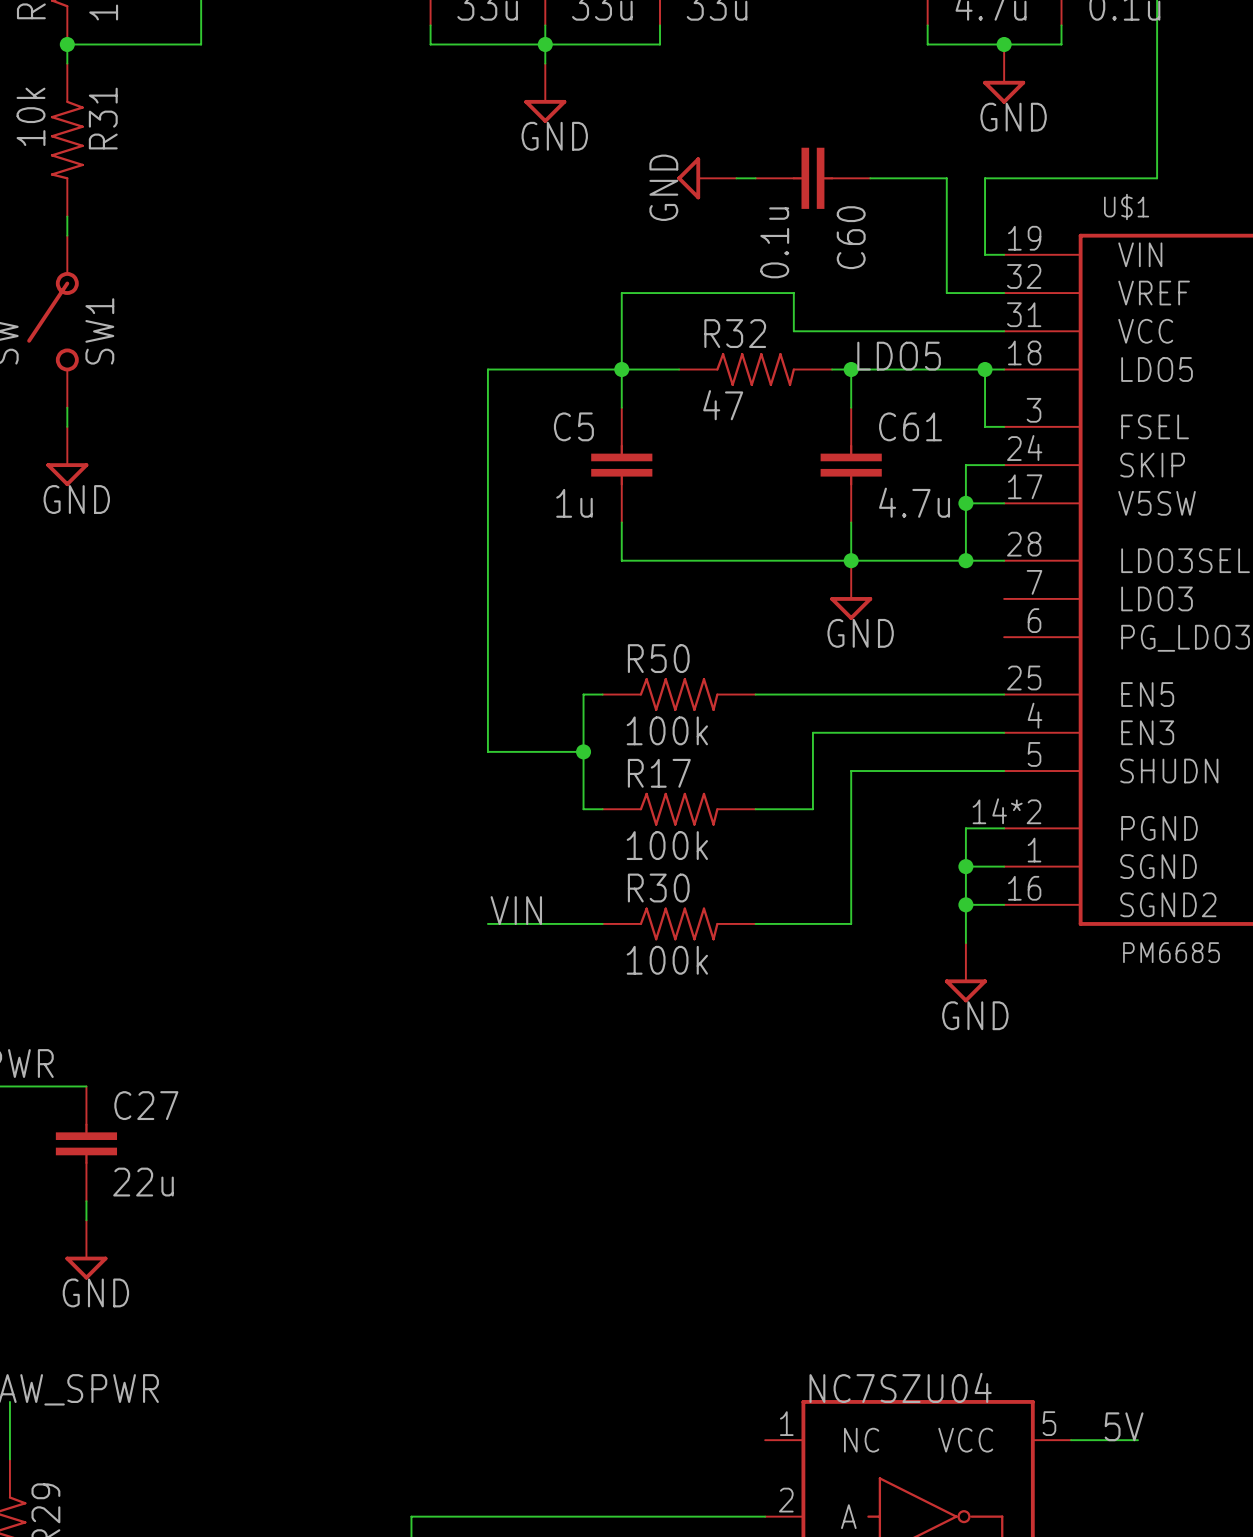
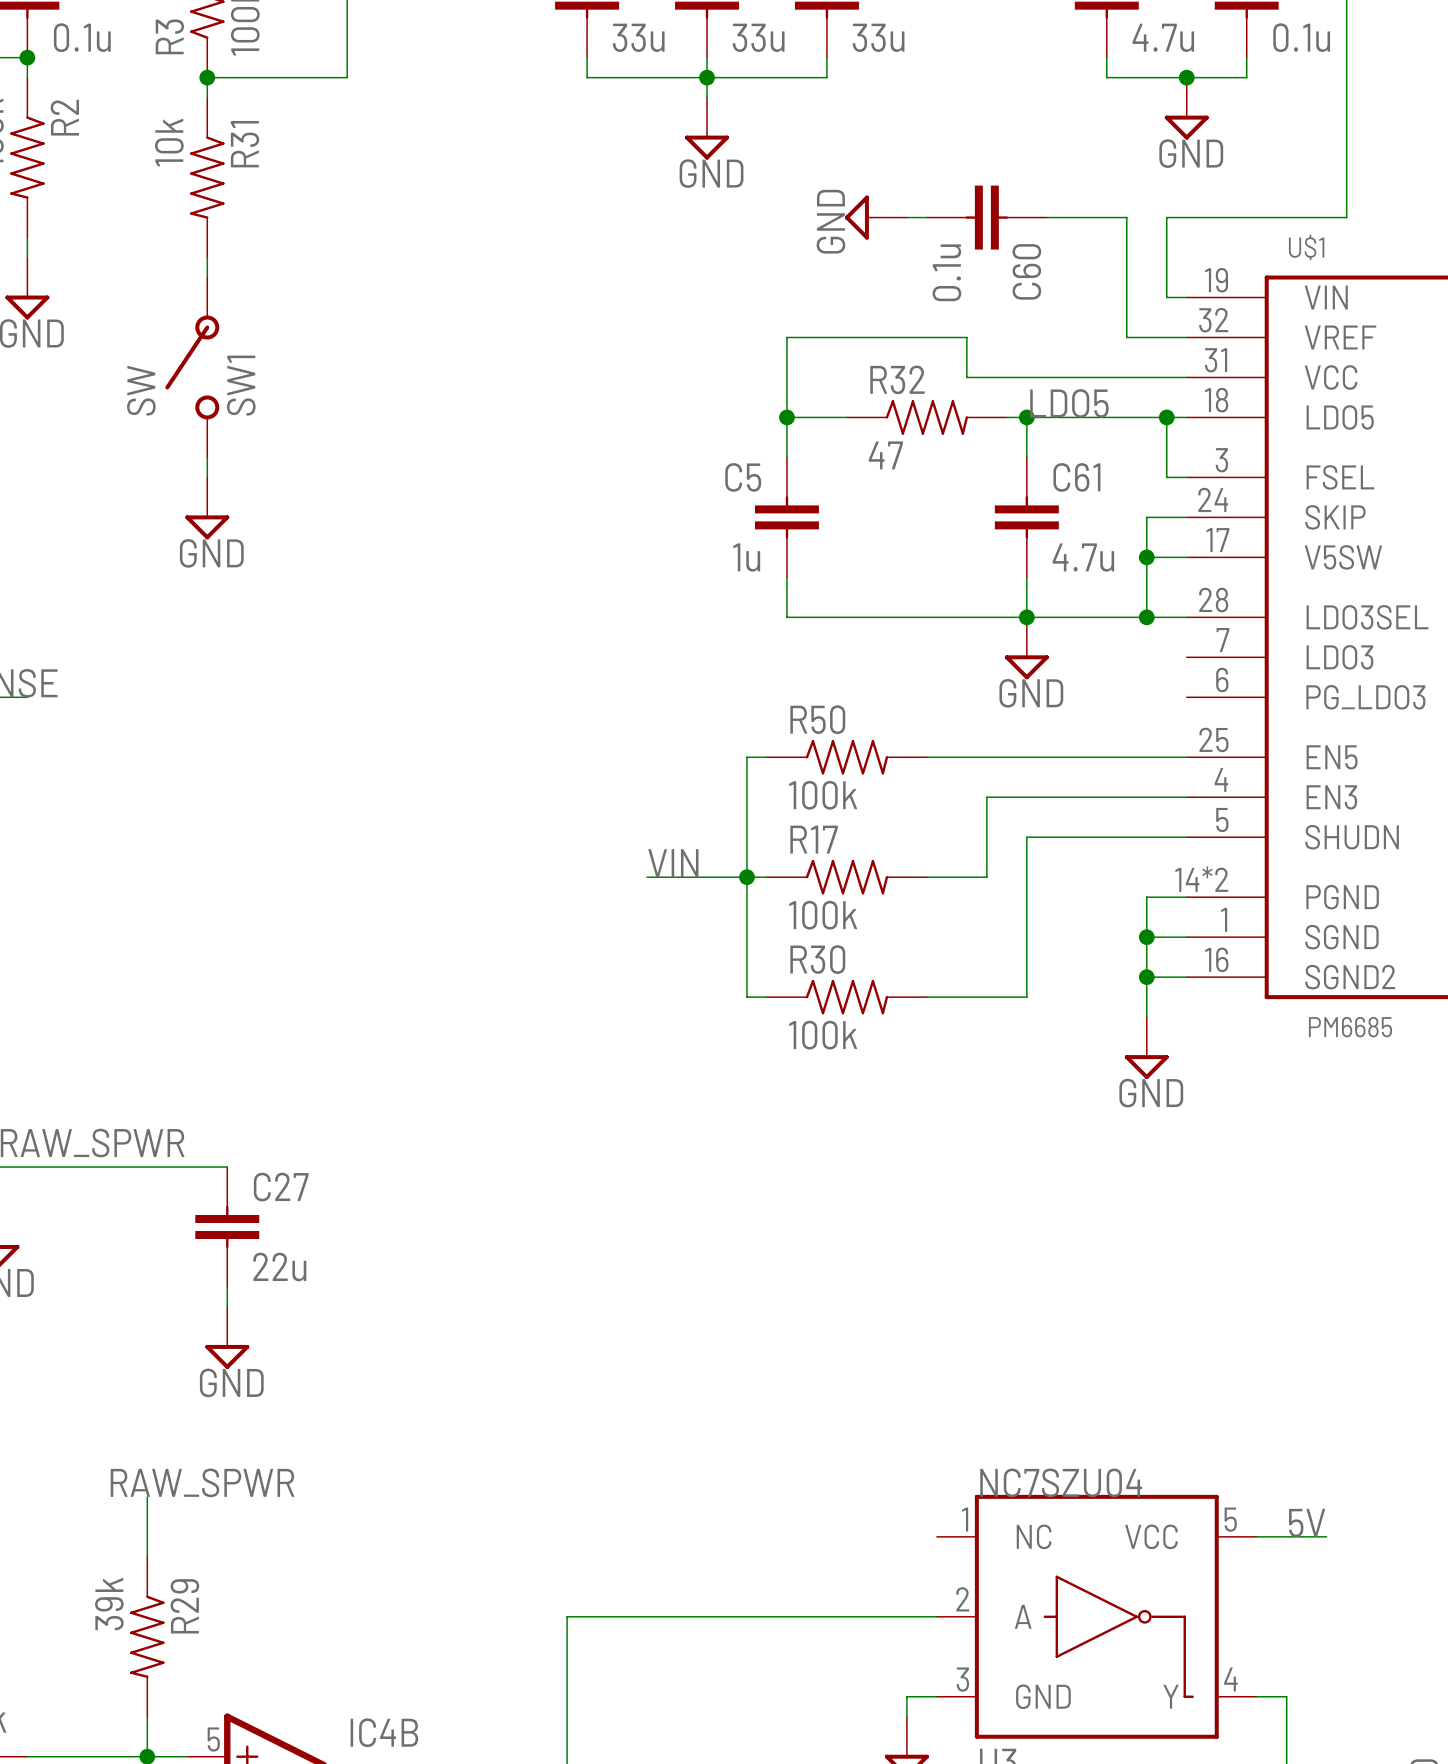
wire: (621, 369) (487, 369) (487, 751) (583, 751) -> none
junction position: (583, 751) -> (747, 877)
label position: VIN (516, 910) -> VIN (673, 863)
wire: (487, 923) (583, 923) -> (647, 877) (747, 877) (747, 997)

